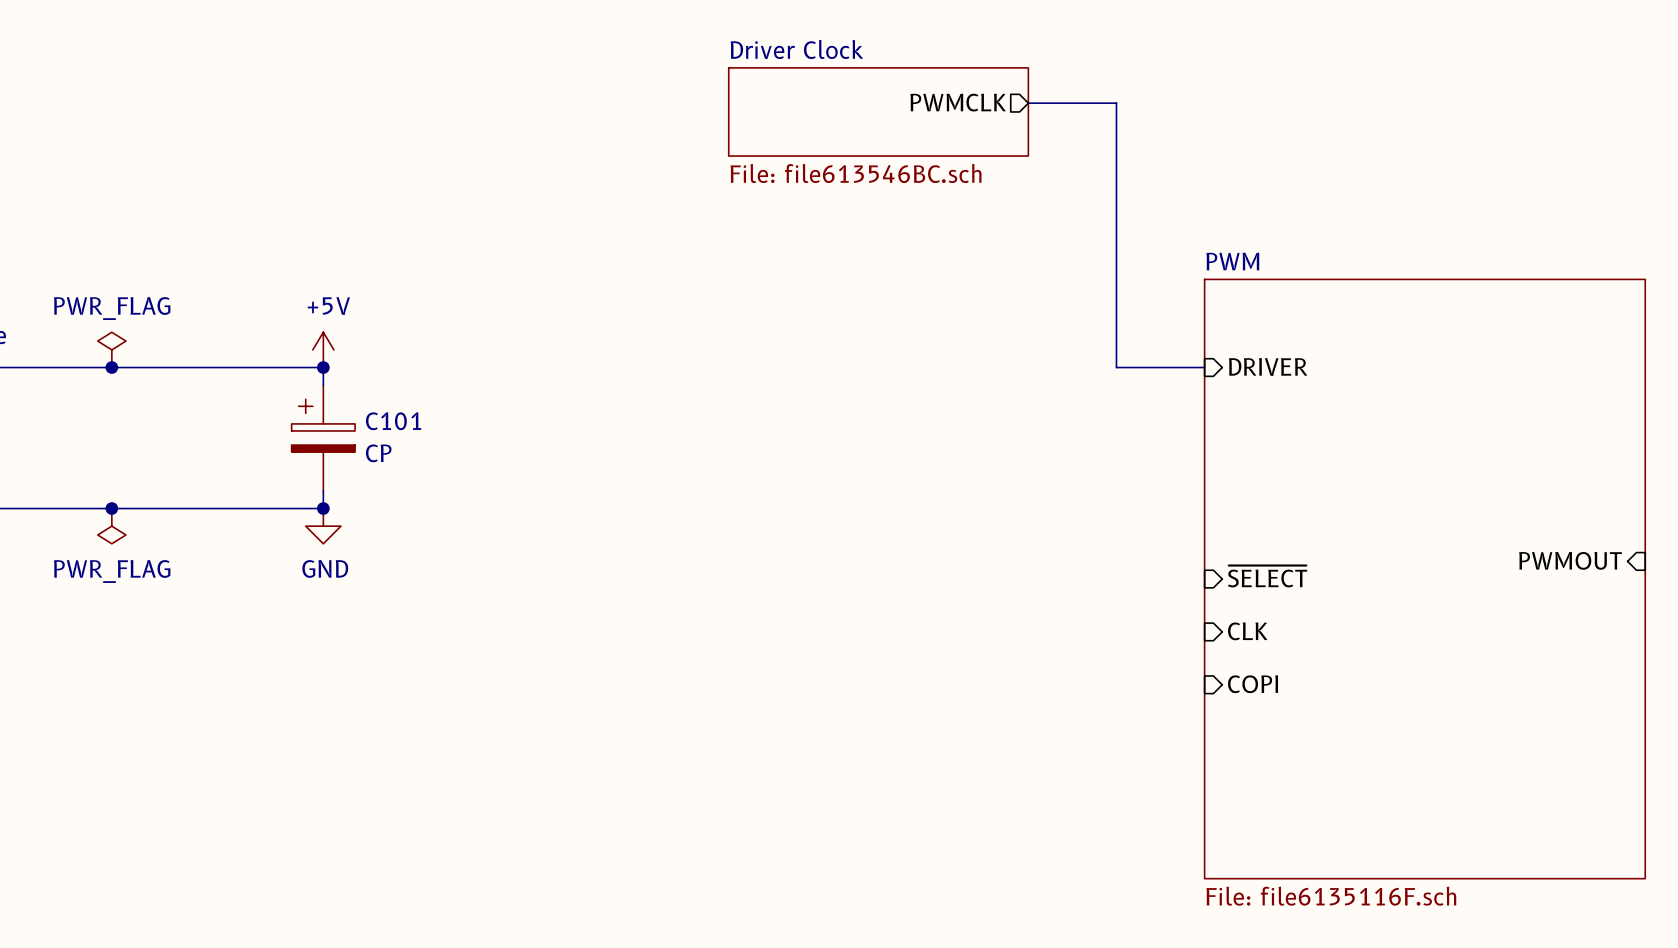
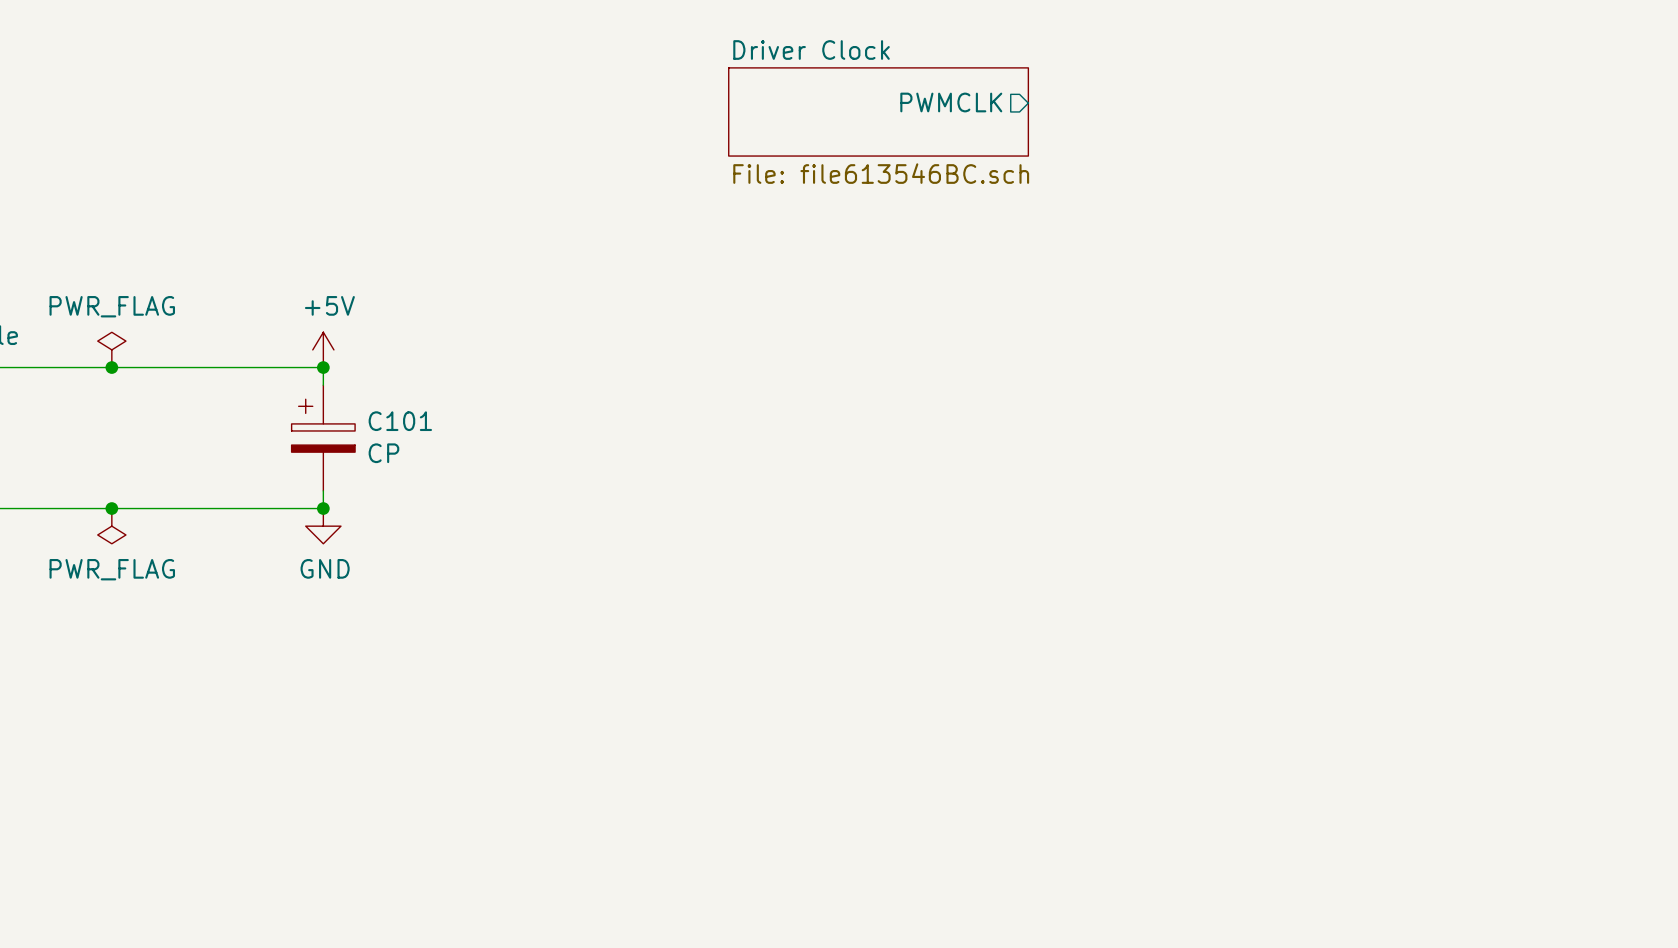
wire: (1028, 103) (1116, 103) (1116, 367) (1204, 367) -> none
sheet pin: DRIVER (1268, 366) -> none
sheet pin: PWMOUT (1570, 560) -> none
sheet pin: ~{SELECT} (1267, 576) -> none
sheet PWM: File: file6135116F.sch (1424, 579) -> none
sheet pin: CLK (1247, 631) -> none
sheet pin: COPI (1253, 684) -> none

